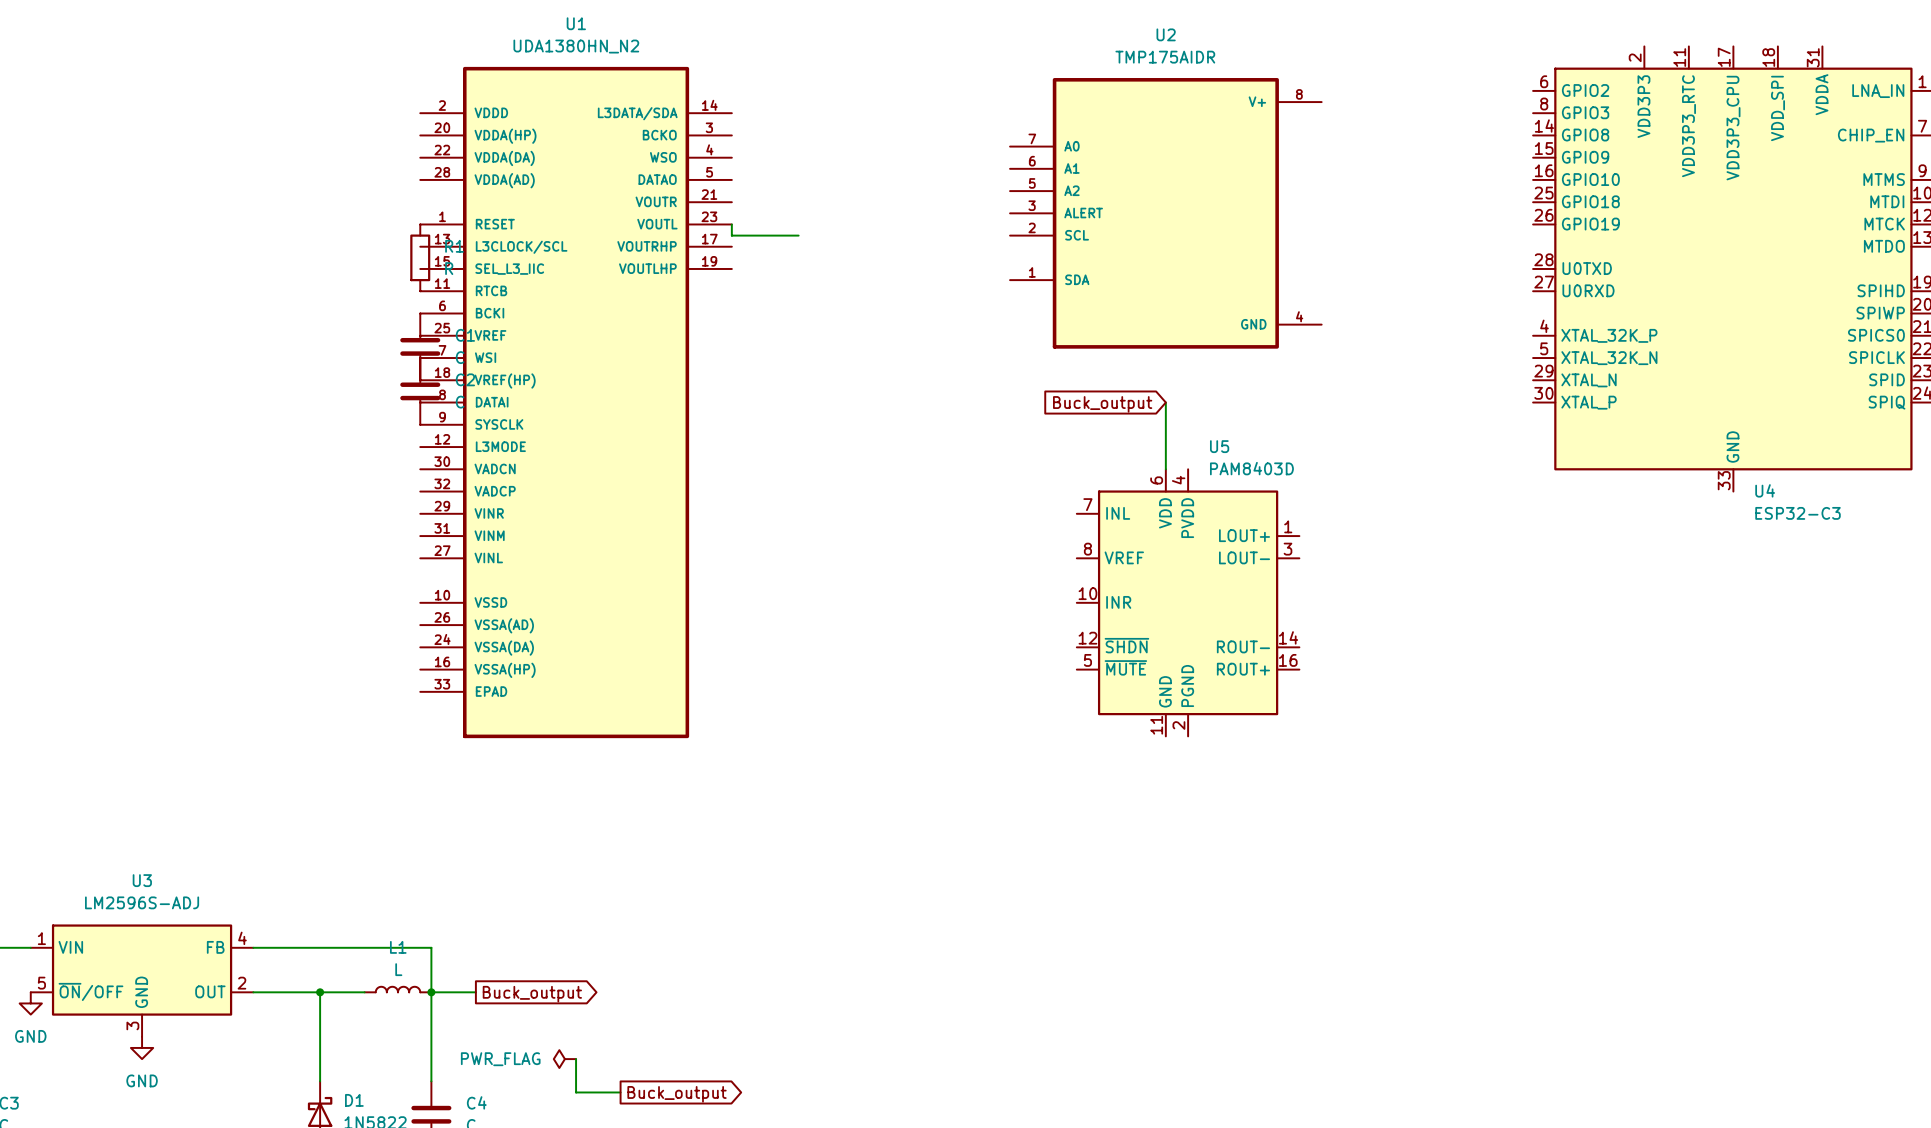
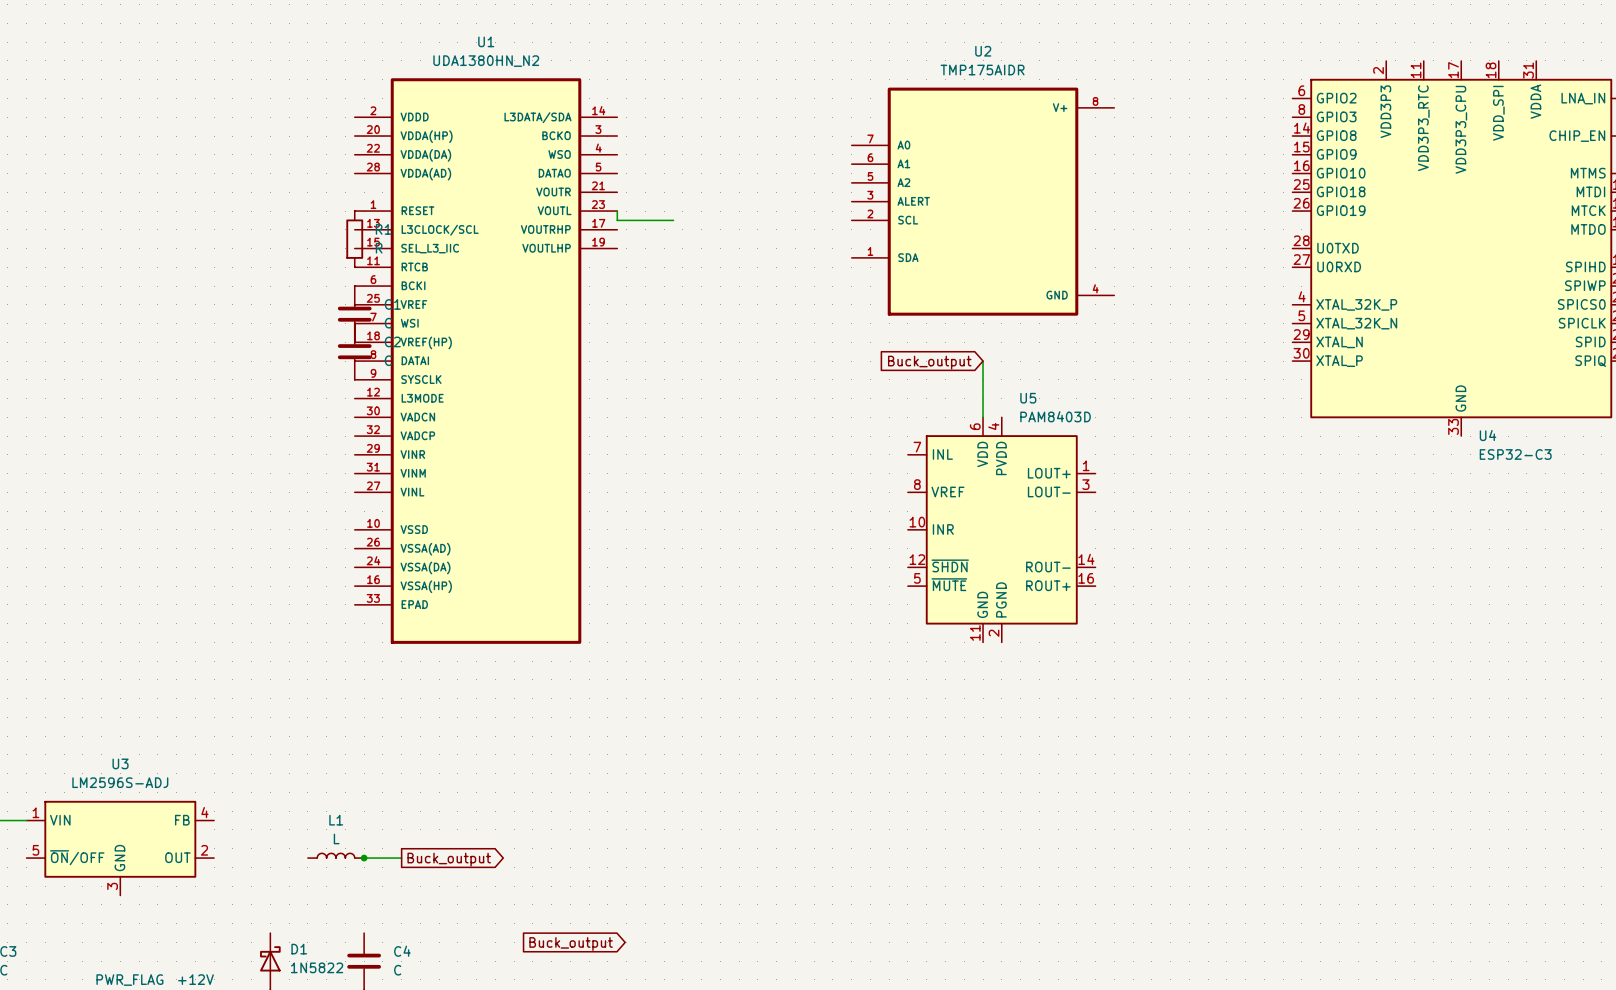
wire: (253, 947) (431, 947) (431, 1081) -> none
wire: (253, 992) (364, 992) -> none
wire: (320, 992) (320, 1081) -> none
junction: (320, 992) -> none
power symbol: GND (30, 1003) -> none
power symbol: GND (142, 1047) -> none
power symbol: PWR_FLAG (564, 1059) -> none
wire: (576, 1059) (576, 1092) (620, 1092) -> none

